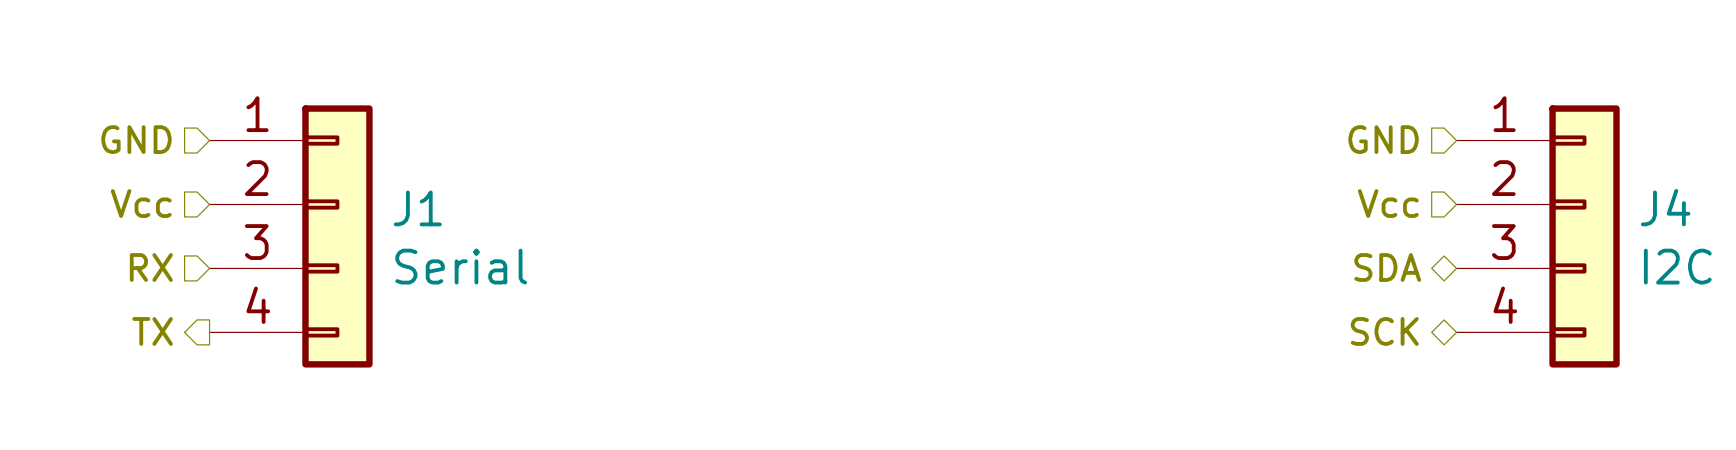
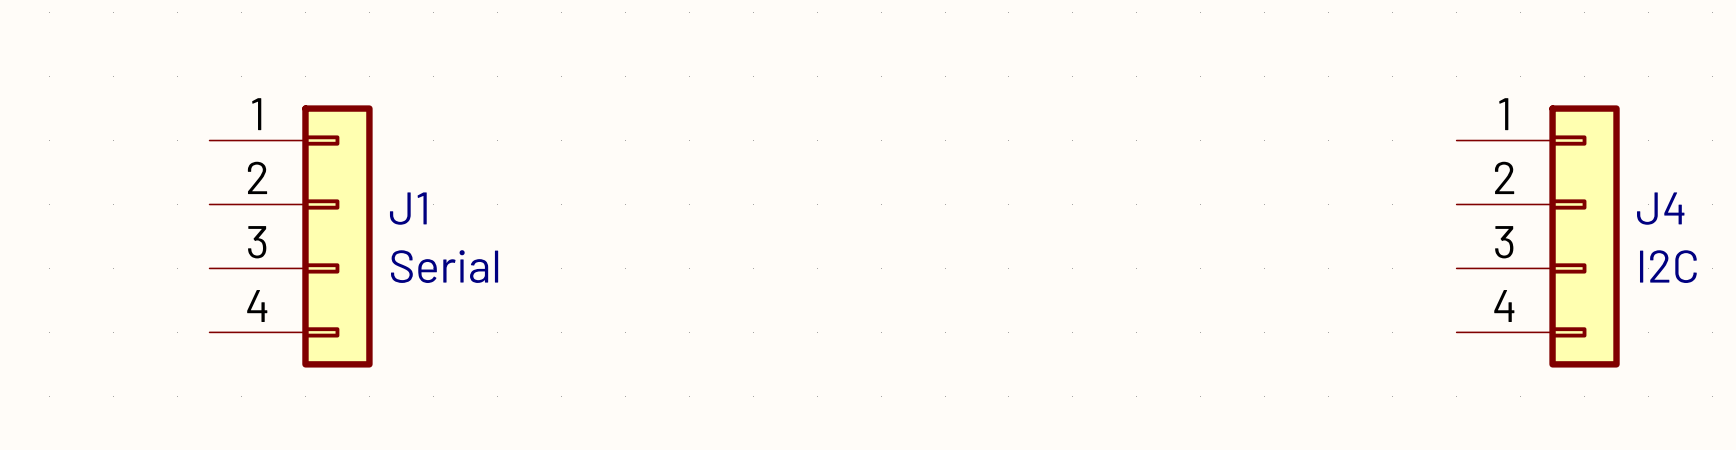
hierarchical label: GND (136, 139) -> none
hierarchical label: GND (1383, 139) -> none
hierarchical label: Vcc (141, 203) -> none
hierarchical label: Vcc (1388, 203) -> none
hierarchical label: RX (151, 267) -> none
hierarchical label: SDA (1387, 267) -> none
hierarchical label: TX (152, 331) -> none
hierarchical label: SCK (1384, 331) -> none

